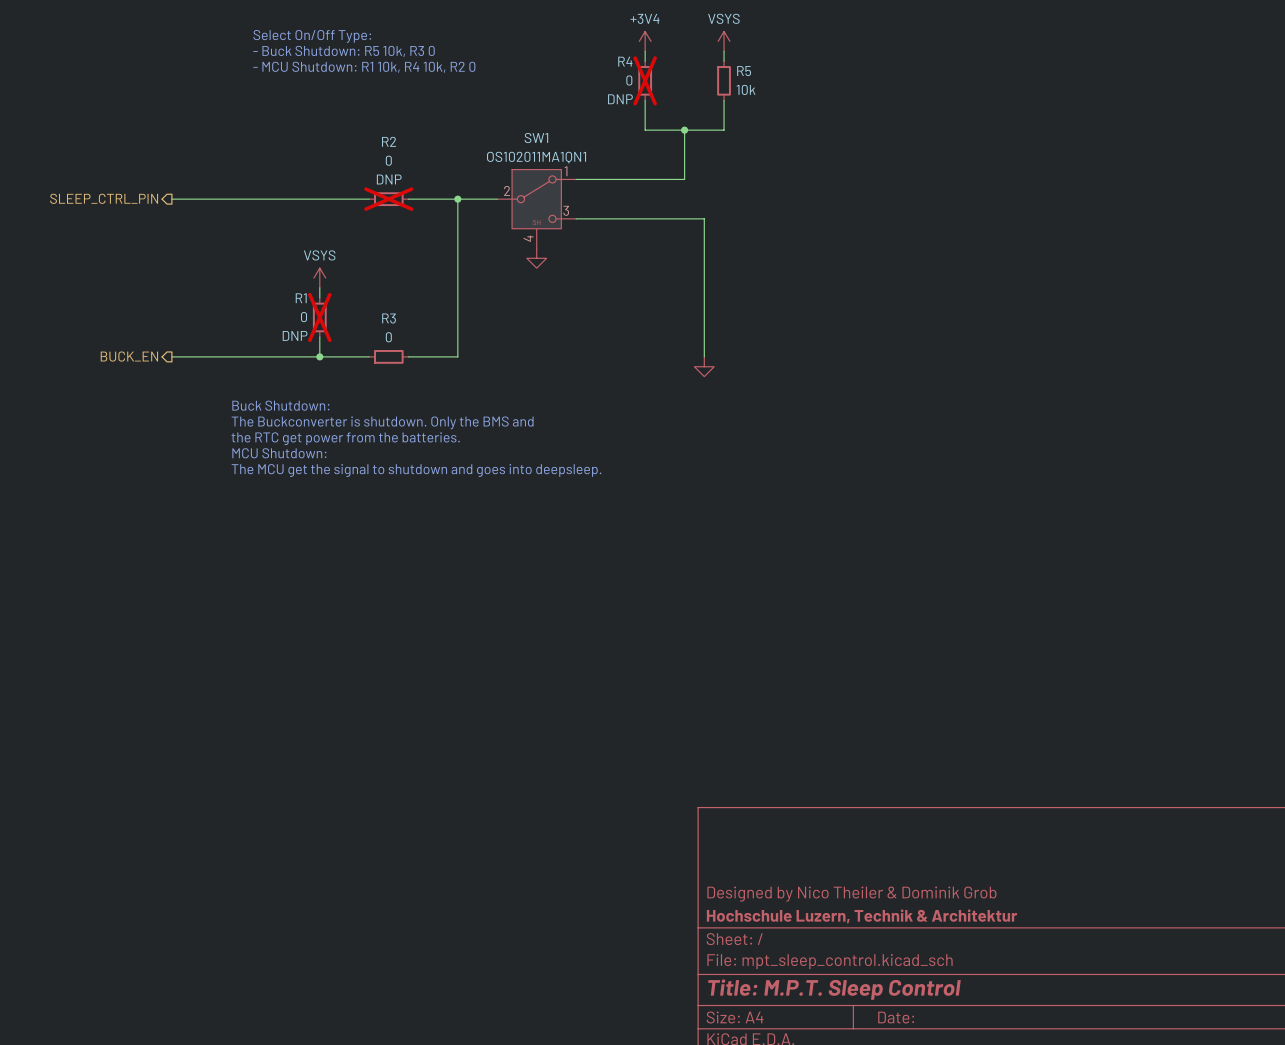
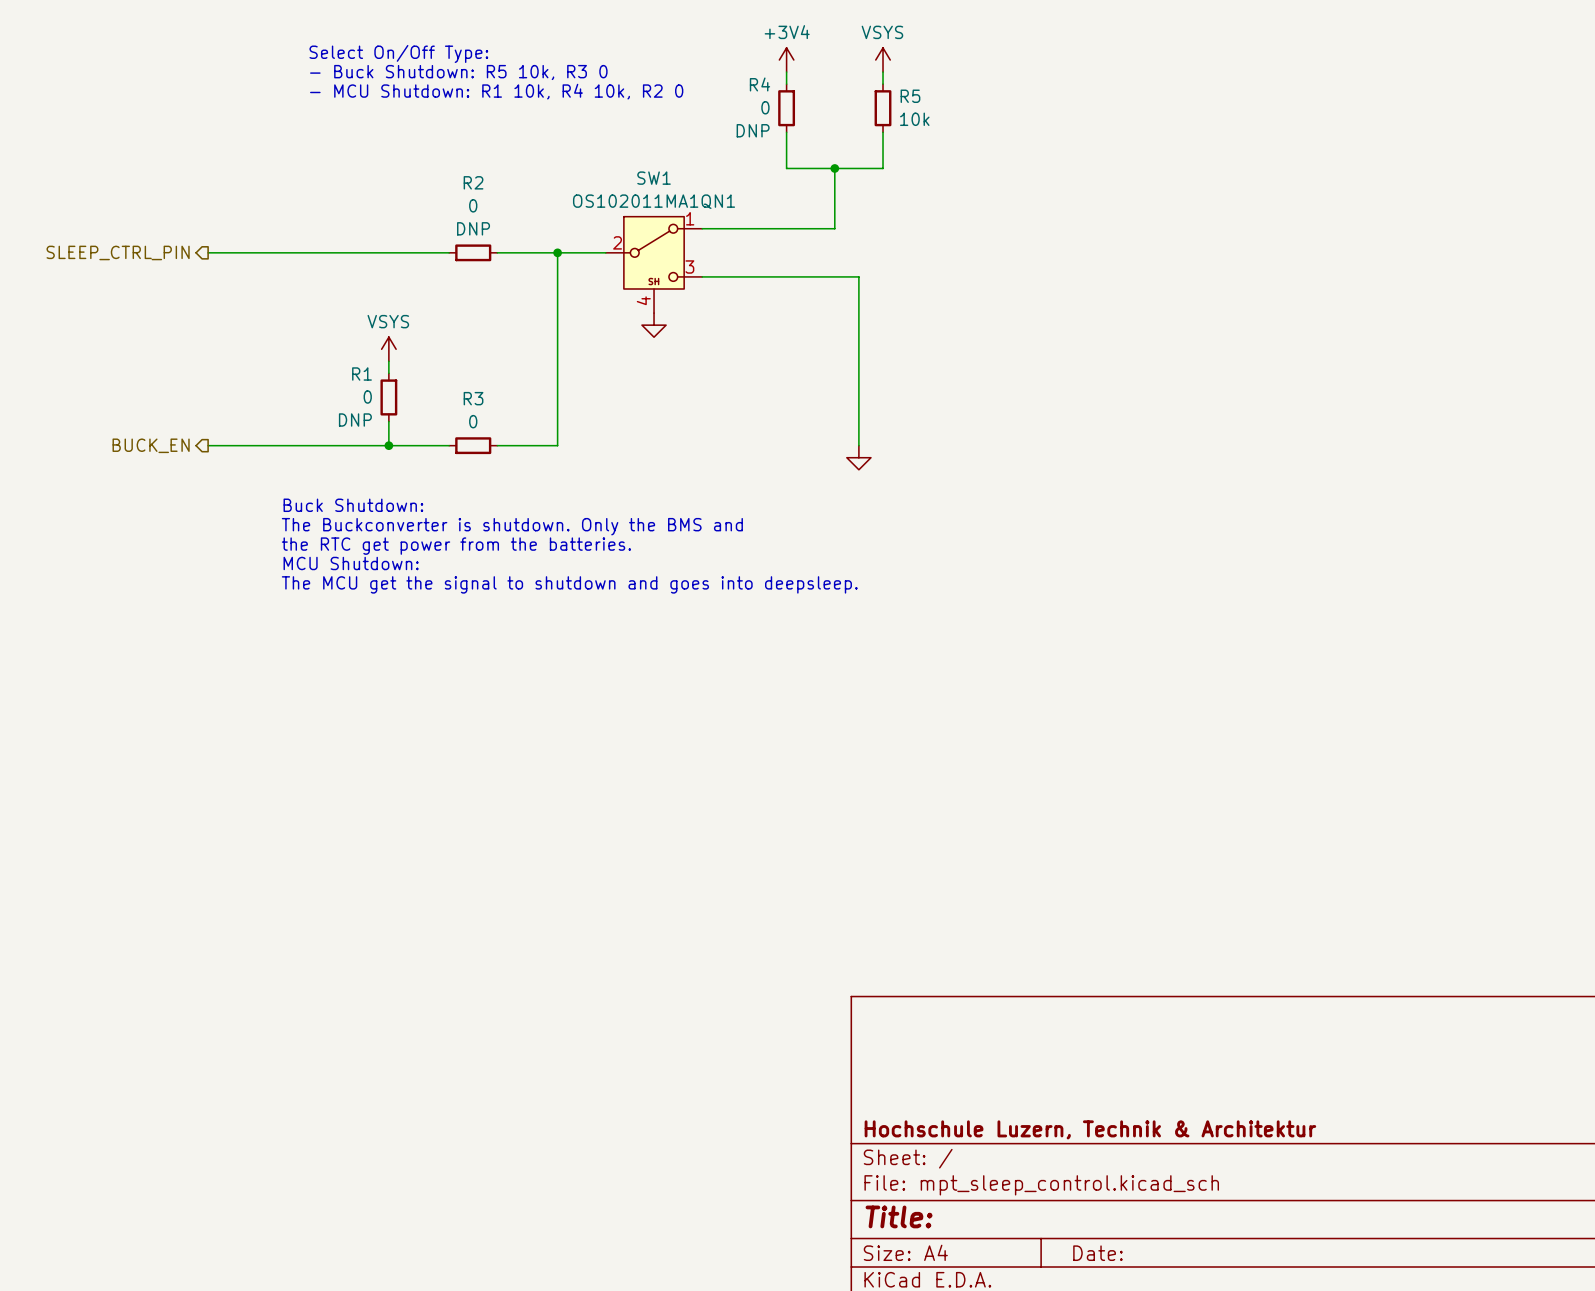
R4 do-not-place cross: (645, 80) -> none
R2 do-not-place cross: (388, 199) -> none
R1 do-not-place cross: (319, 317) -> none
title block: Designed by Nico Theiler & Dominik Grob (851, 894) -> none
title block: Title: M.P.T. Sleep Control (834, 989) -> Title: (899, 1216)

